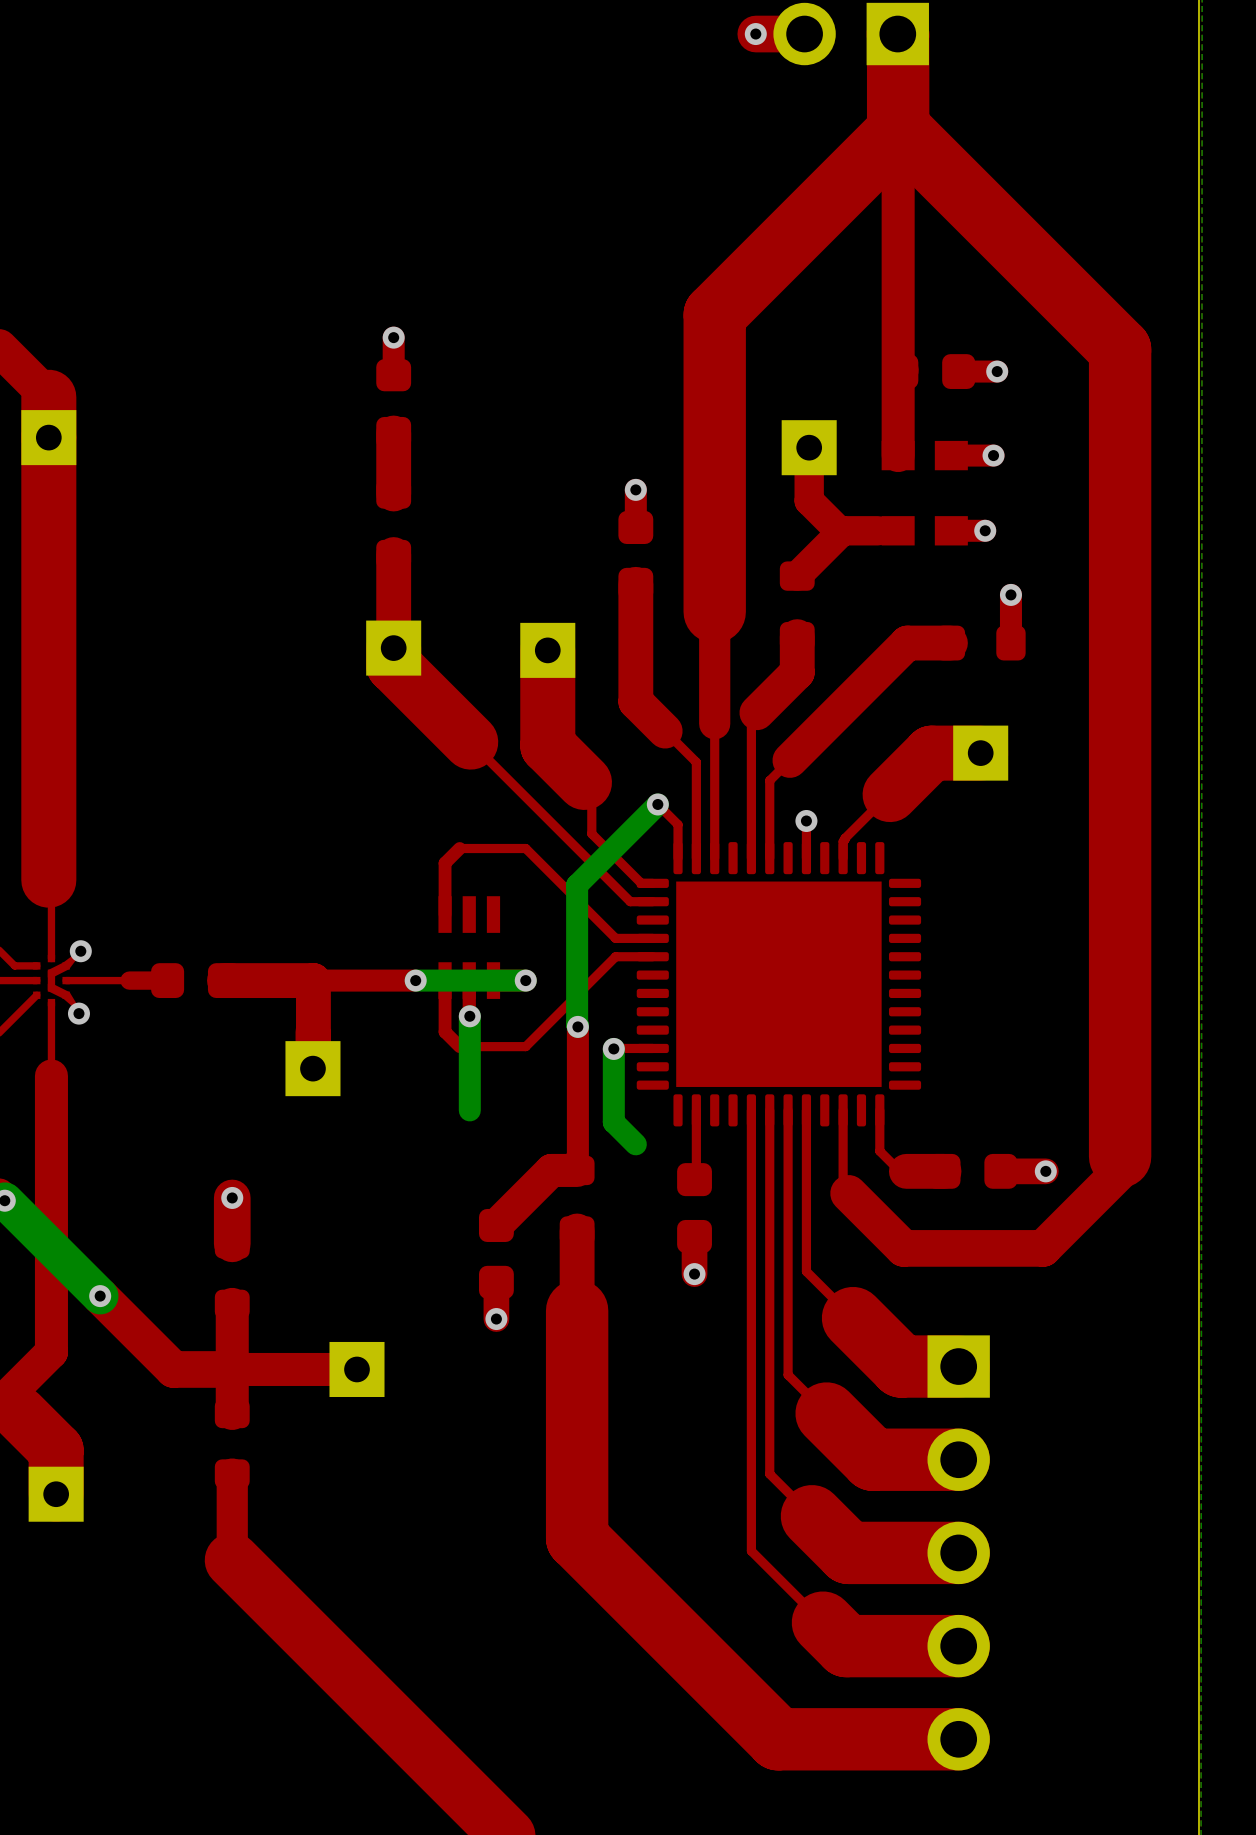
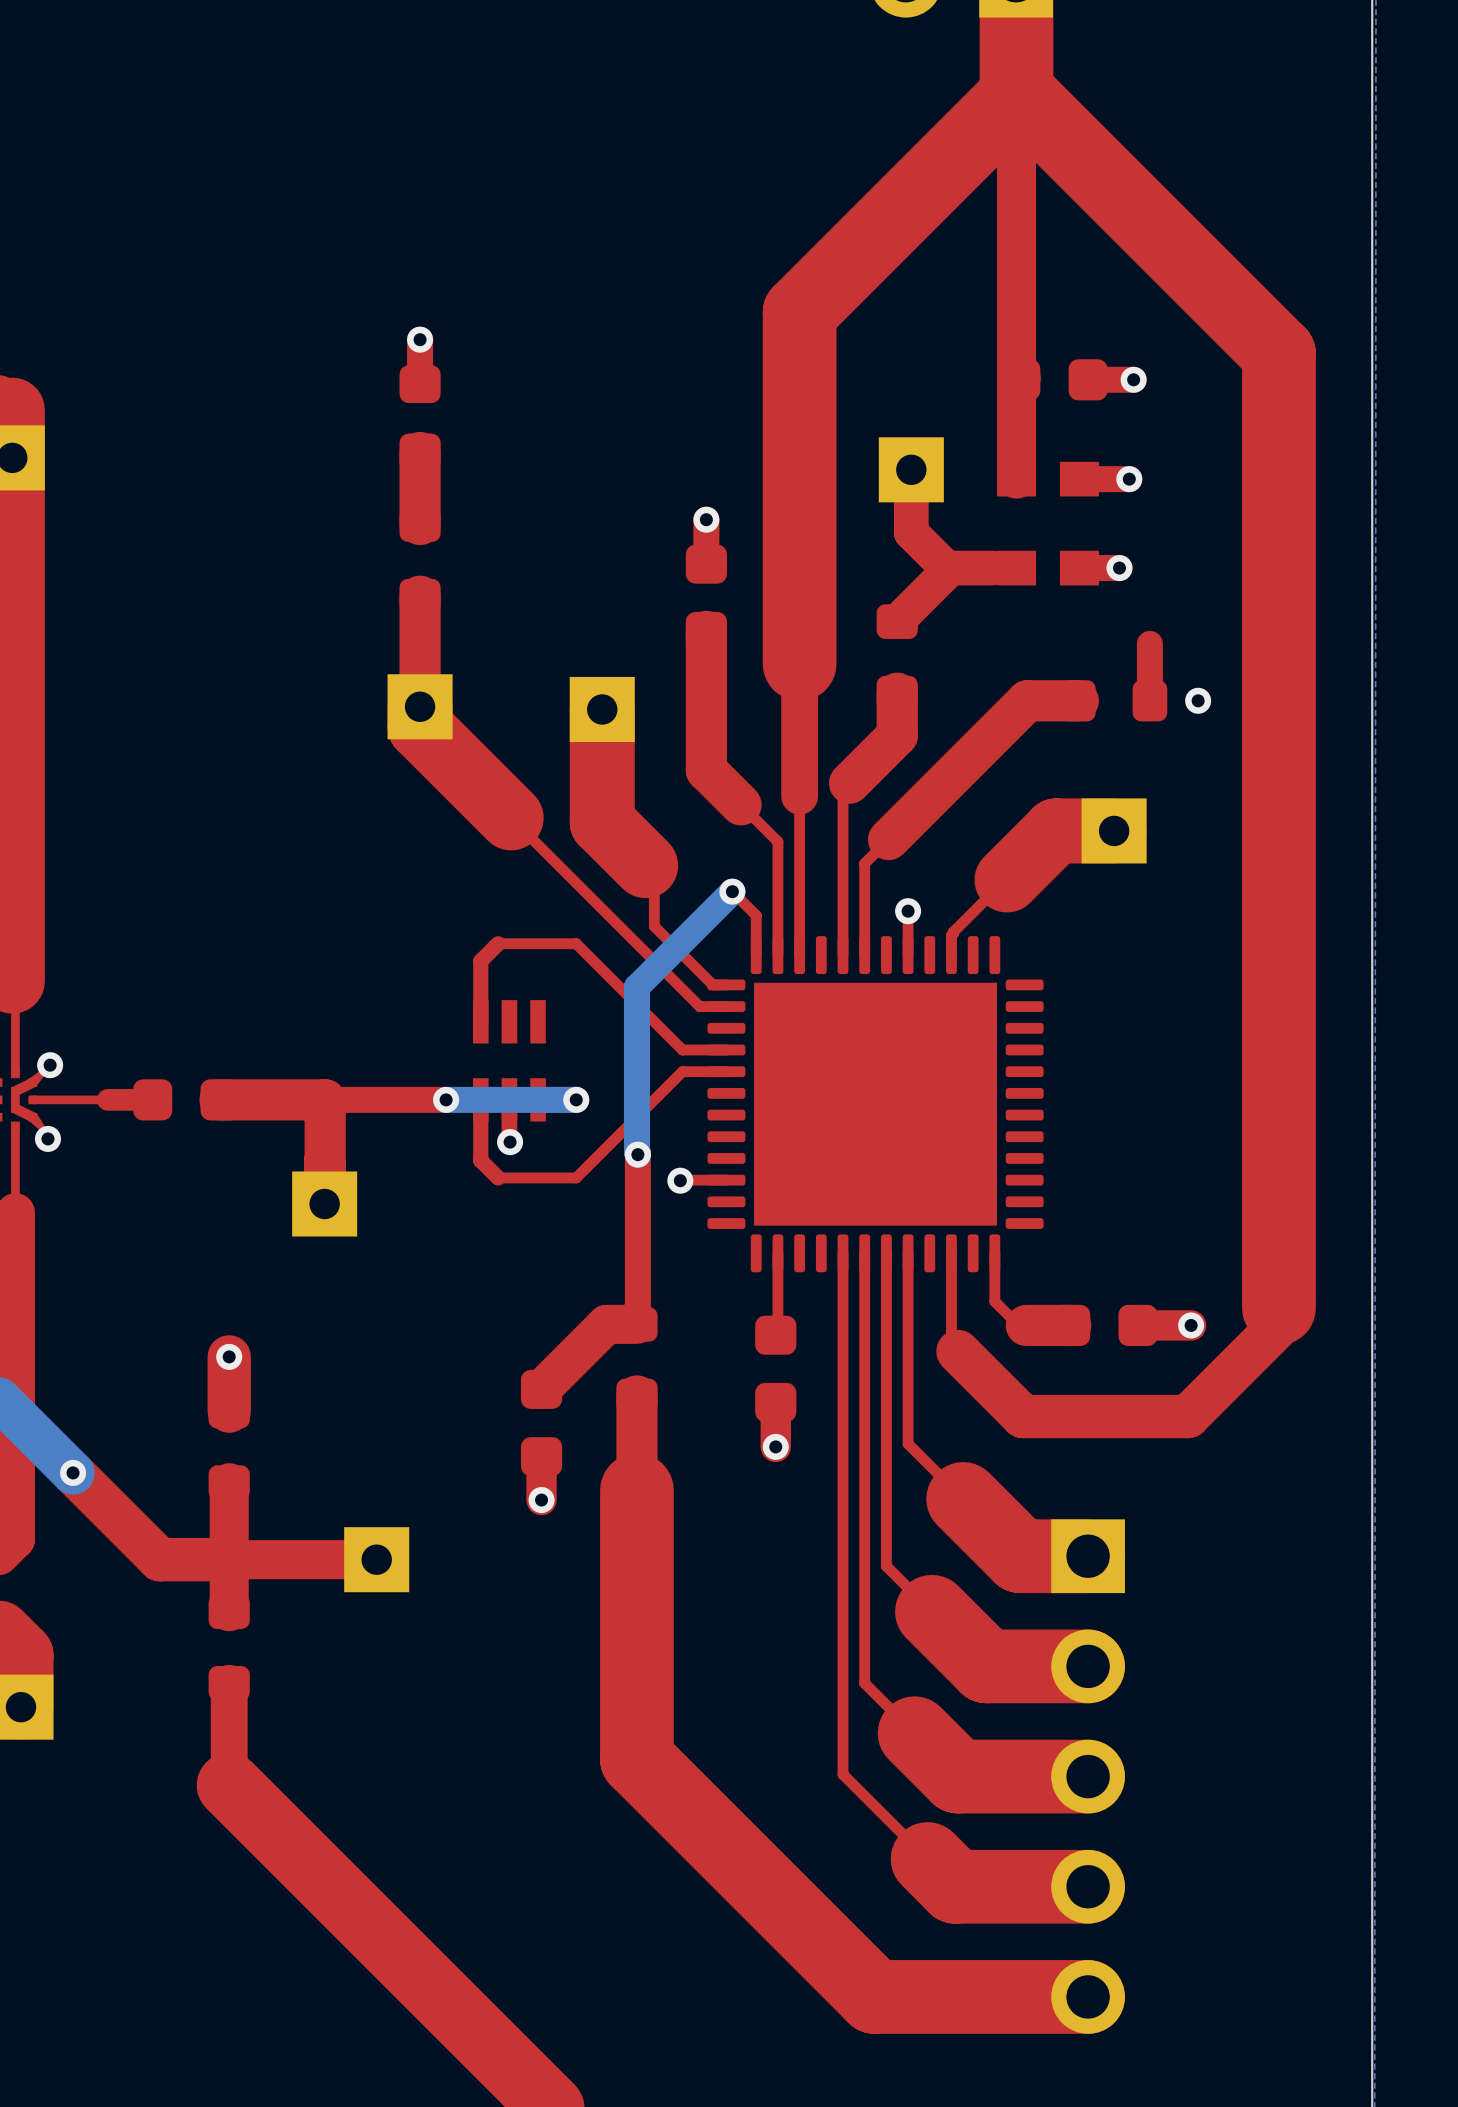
via position: (1010, 594) -> (1198, 700)
bottom track: (469, 1016) (469, 1110) -> none
bottom track: (613, 1048) (613, 1122) (635, 1144) -> none

